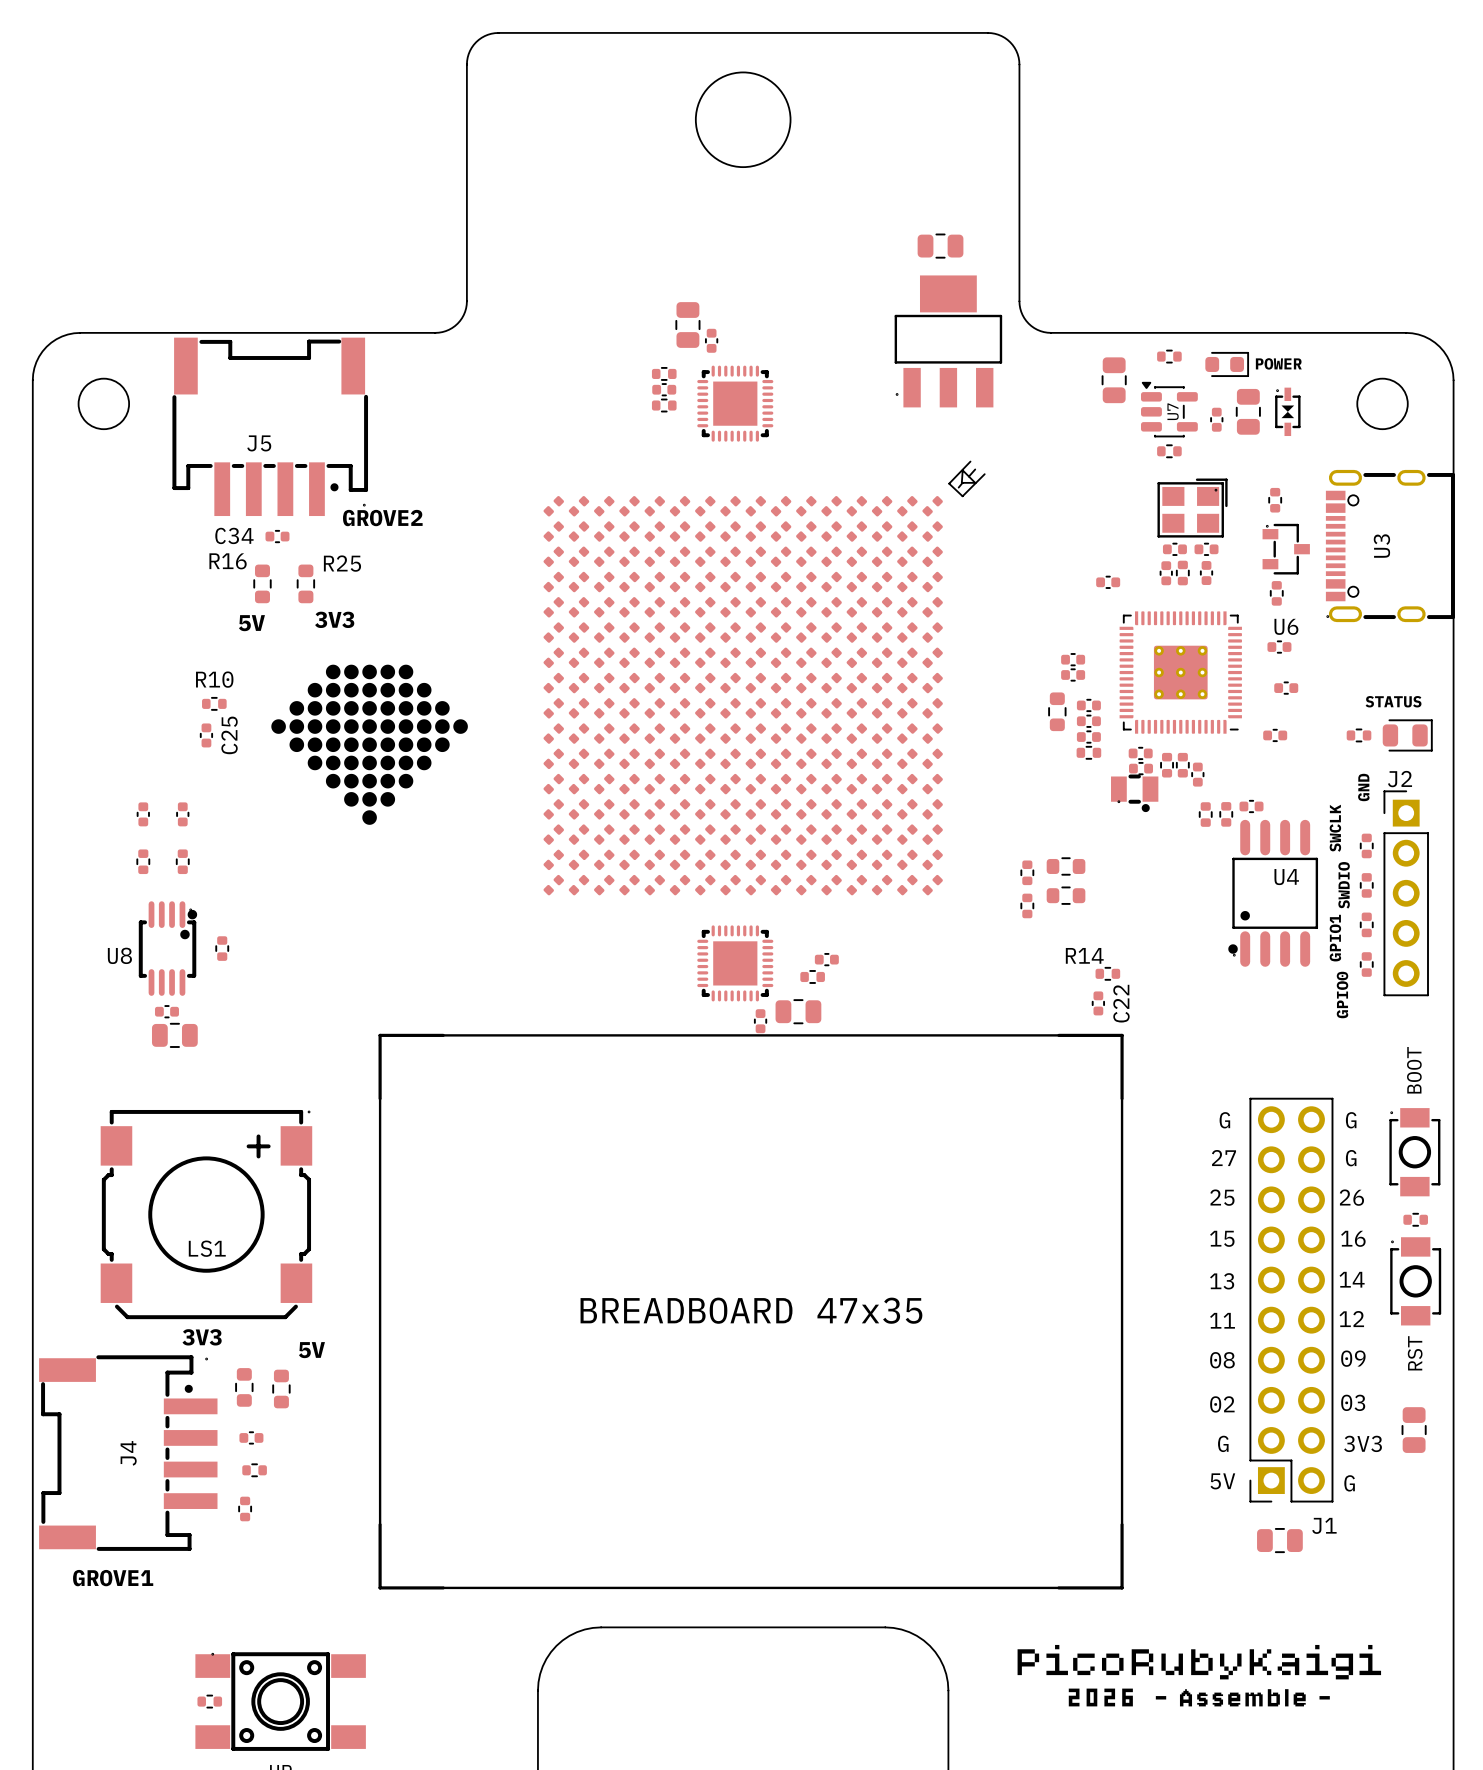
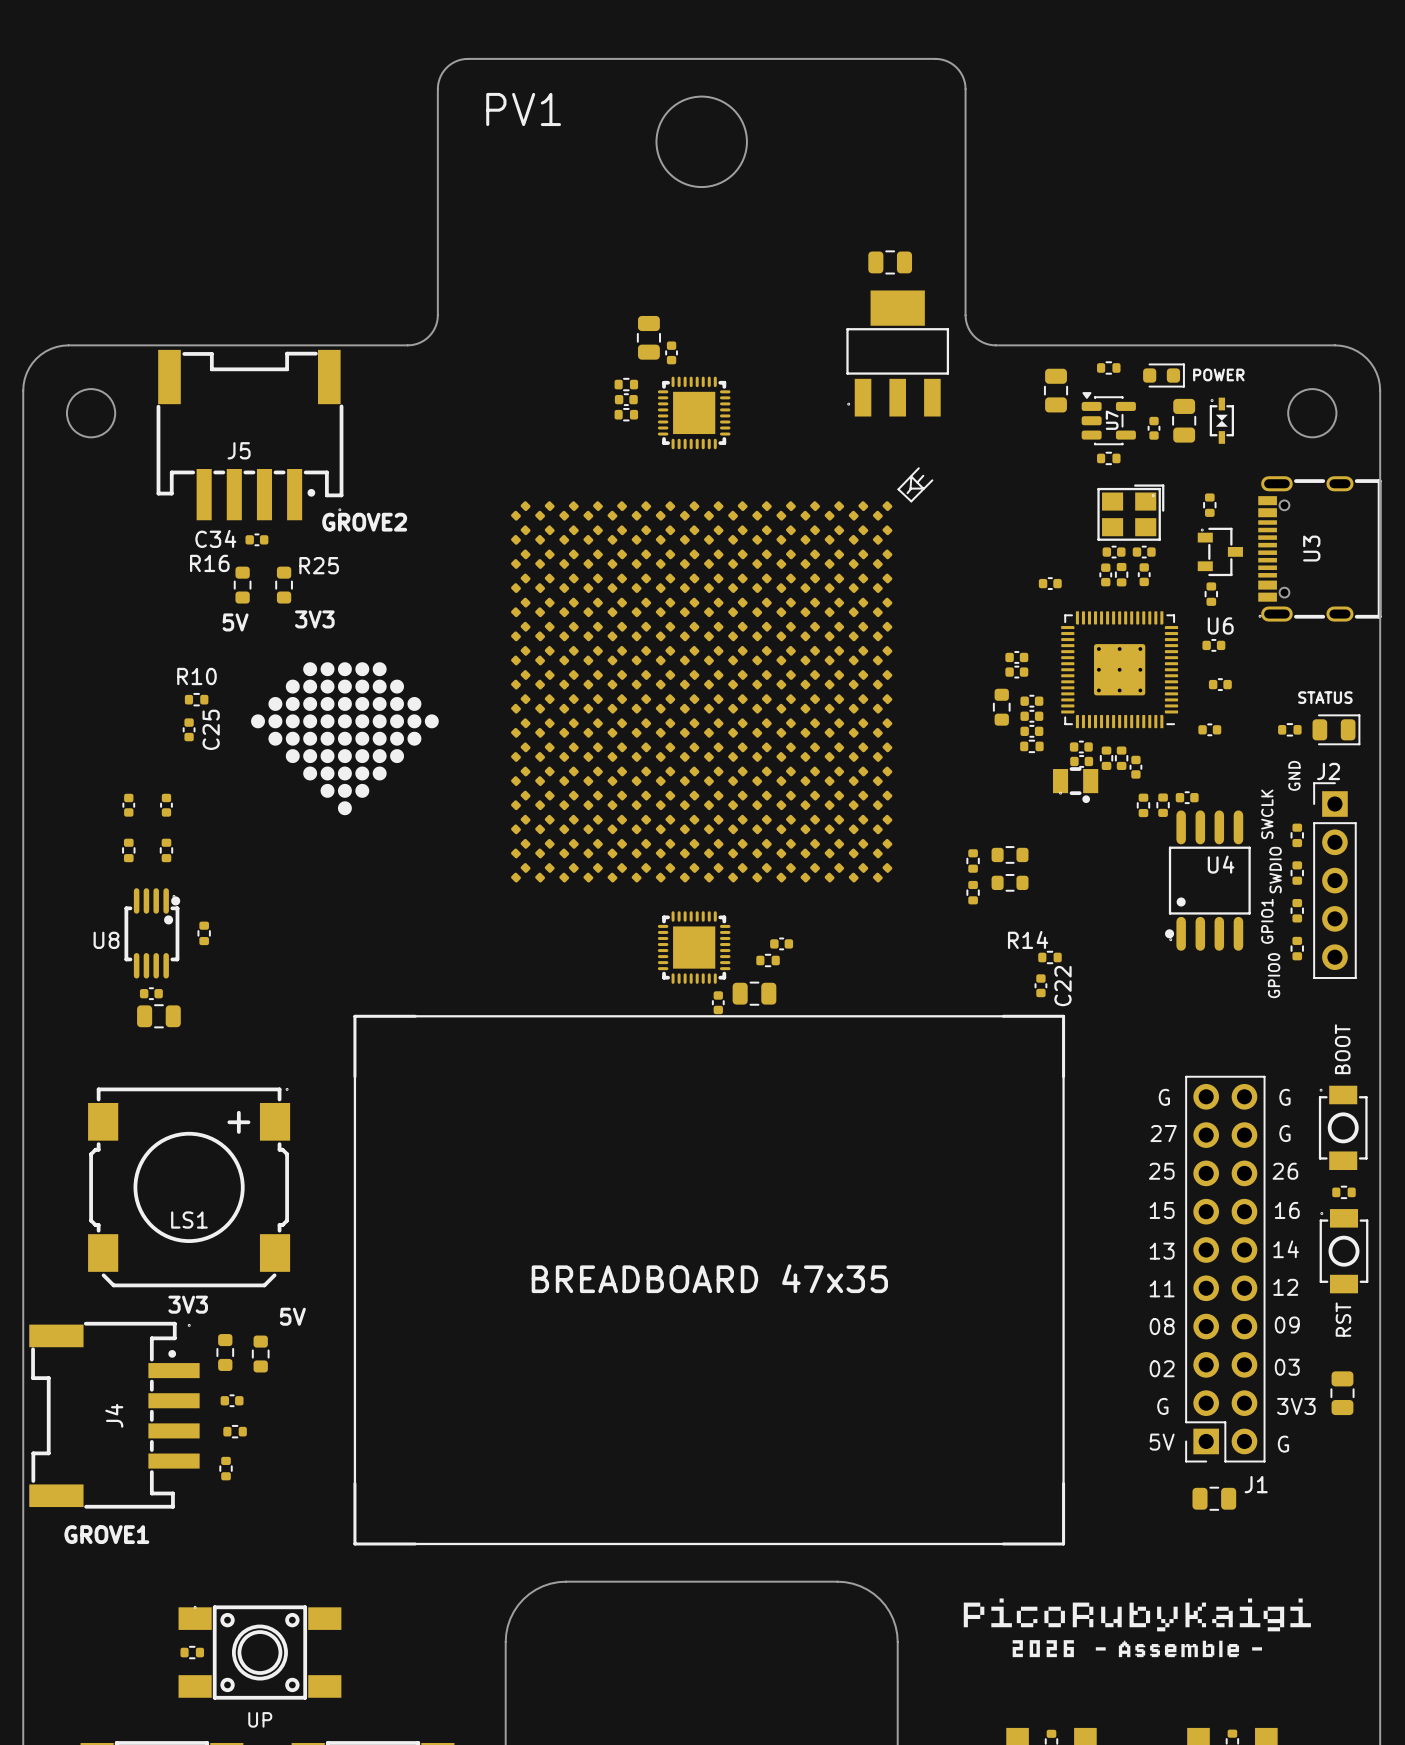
text: none -> PV1 (523, 109)

